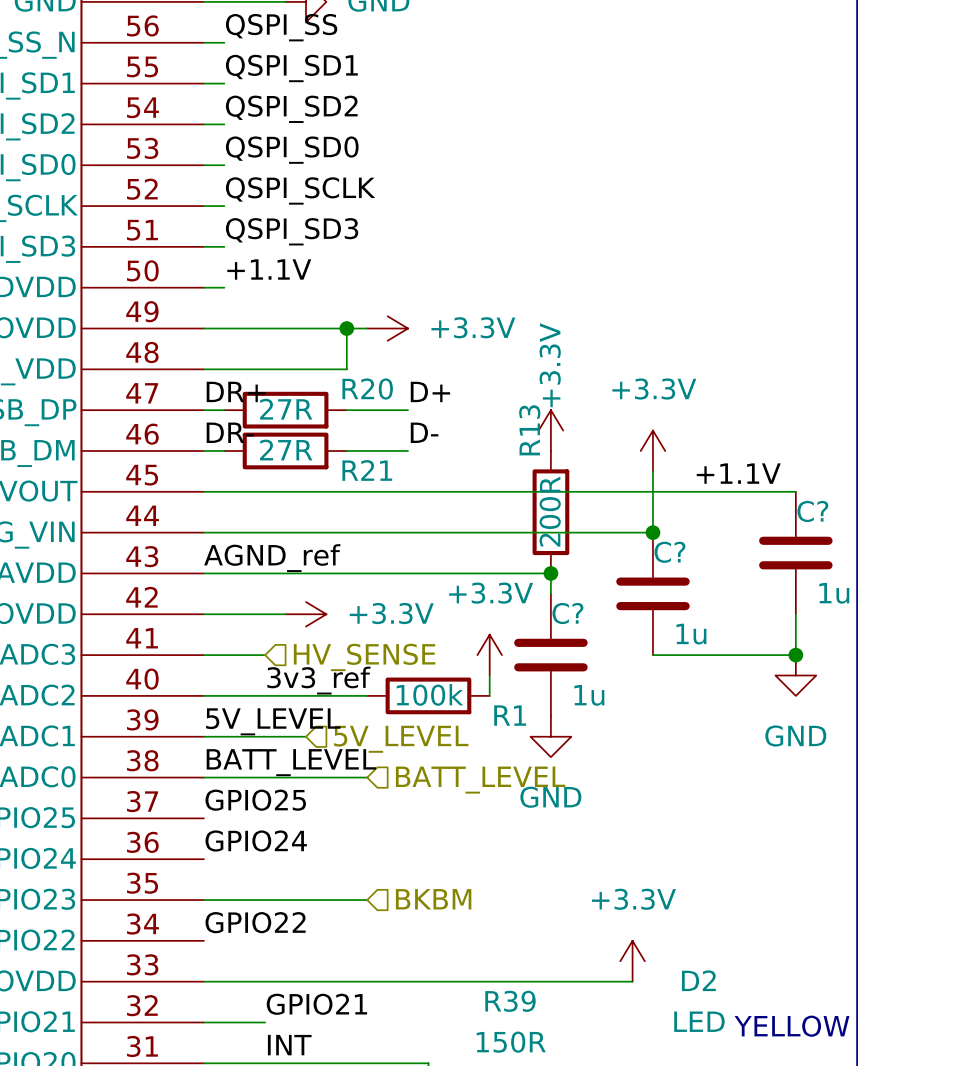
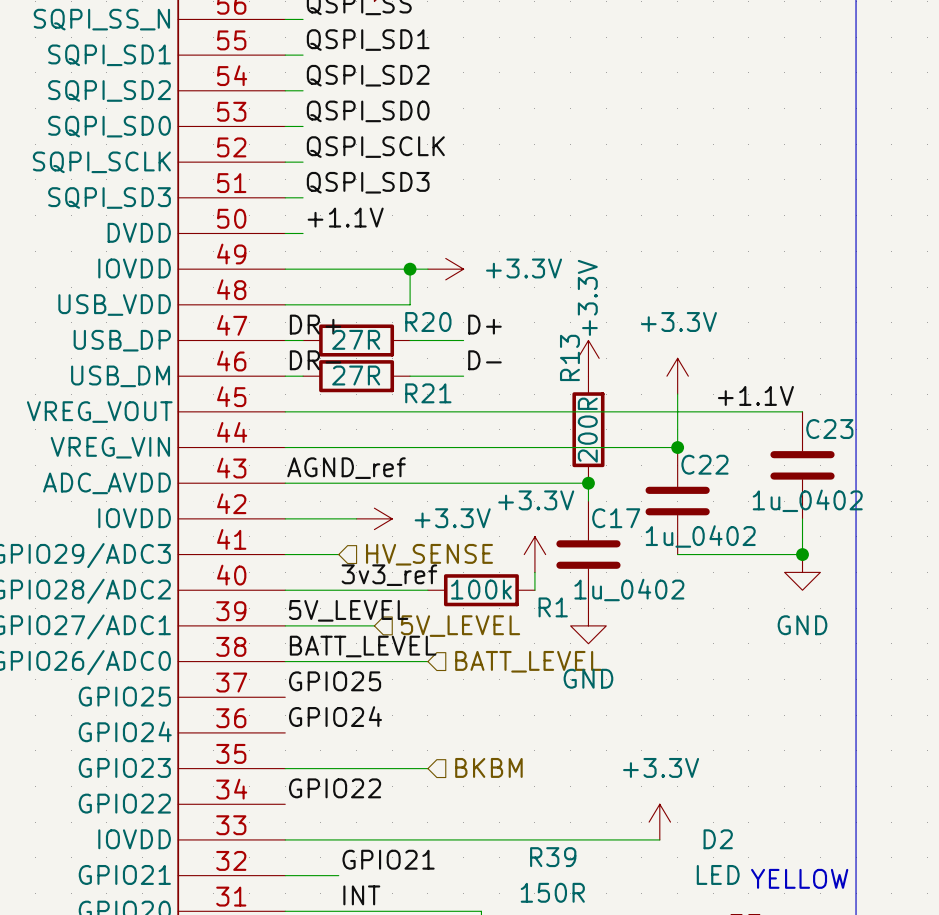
C? name: C? (812, 511) -> C23 (829, 429)
C? name: C? (669, 552) -> C22 (704, 464)
C? value: 1u (834, 593) -> 1u_0402 (807, 500)
C? name: C? (567, 613) -> C17 (616, 518)
C? value: 1u (691, 634) -> 1u_0402 (700, 536)
C? value: 1u (589, 695) -> 1u_0402 (629, 589)

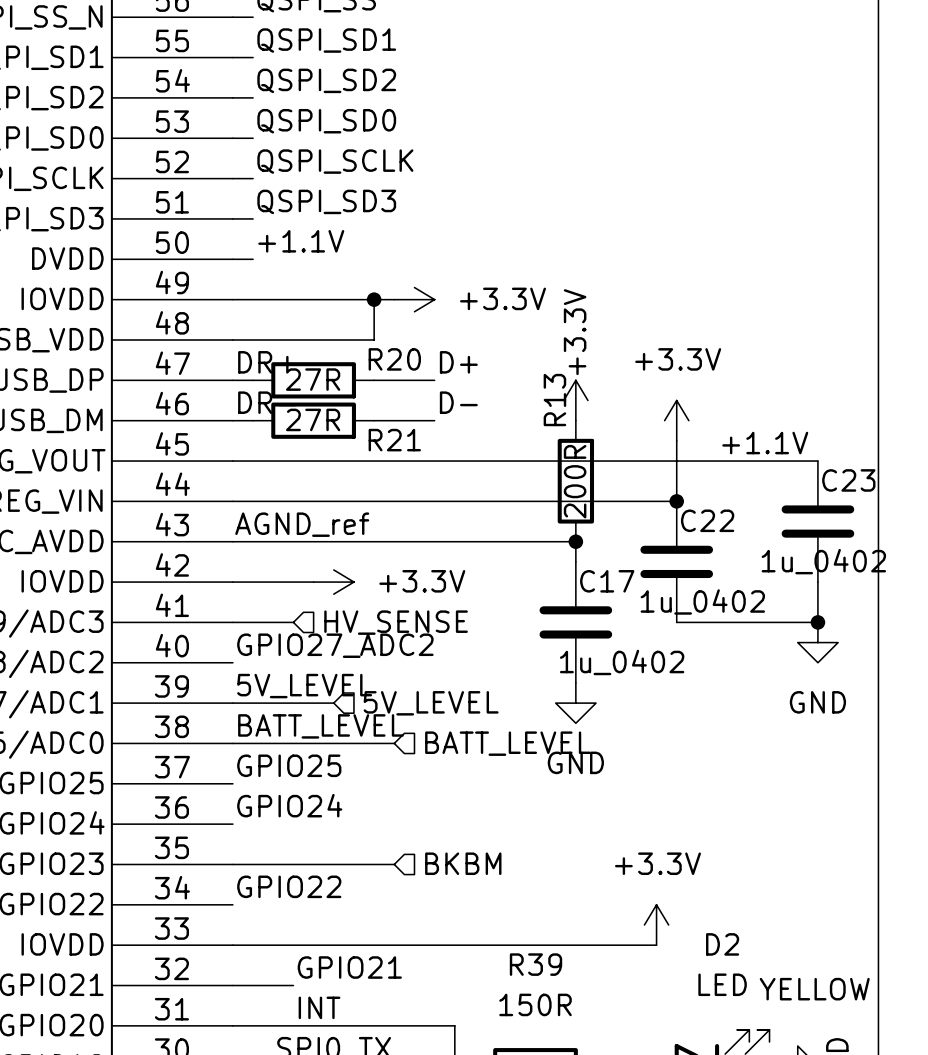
power symbol: +3.3V (534, 554) -> none
wire: (534, 572) (534, 590) -> none
label: none -> GPIO27_ADC2 (335, 645)
label: 3v3_ref (389, 575) -> none
wire: (285, 590) (427, 590) -> none
R1: 100k (481, 590) -> none

